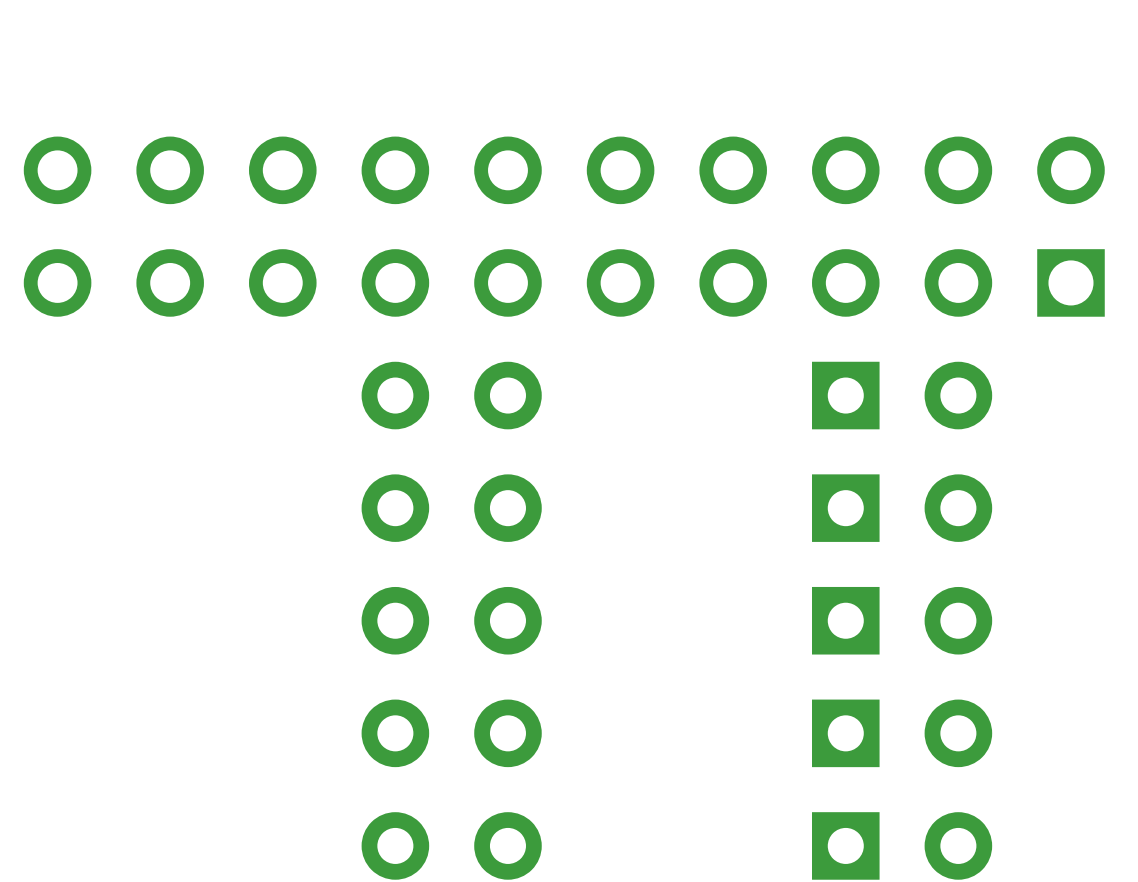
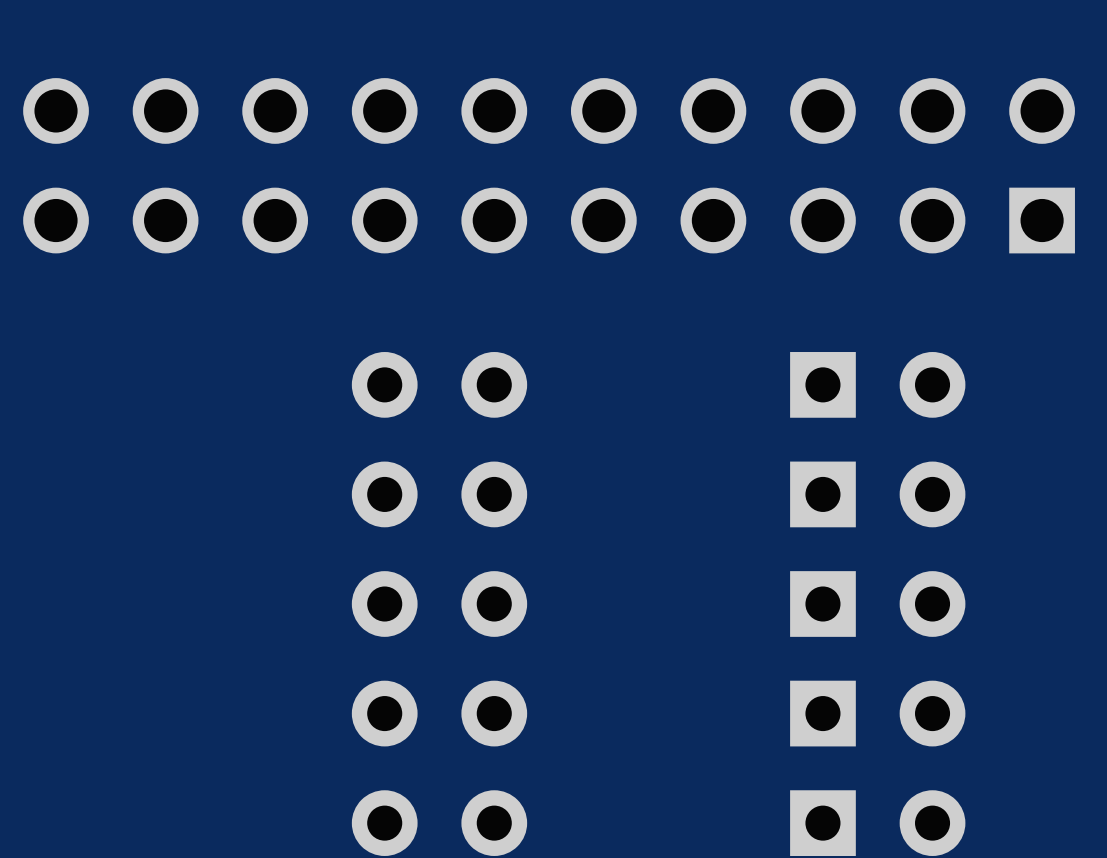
part: none -> (549, 165)
part: (564, 226) -> none

